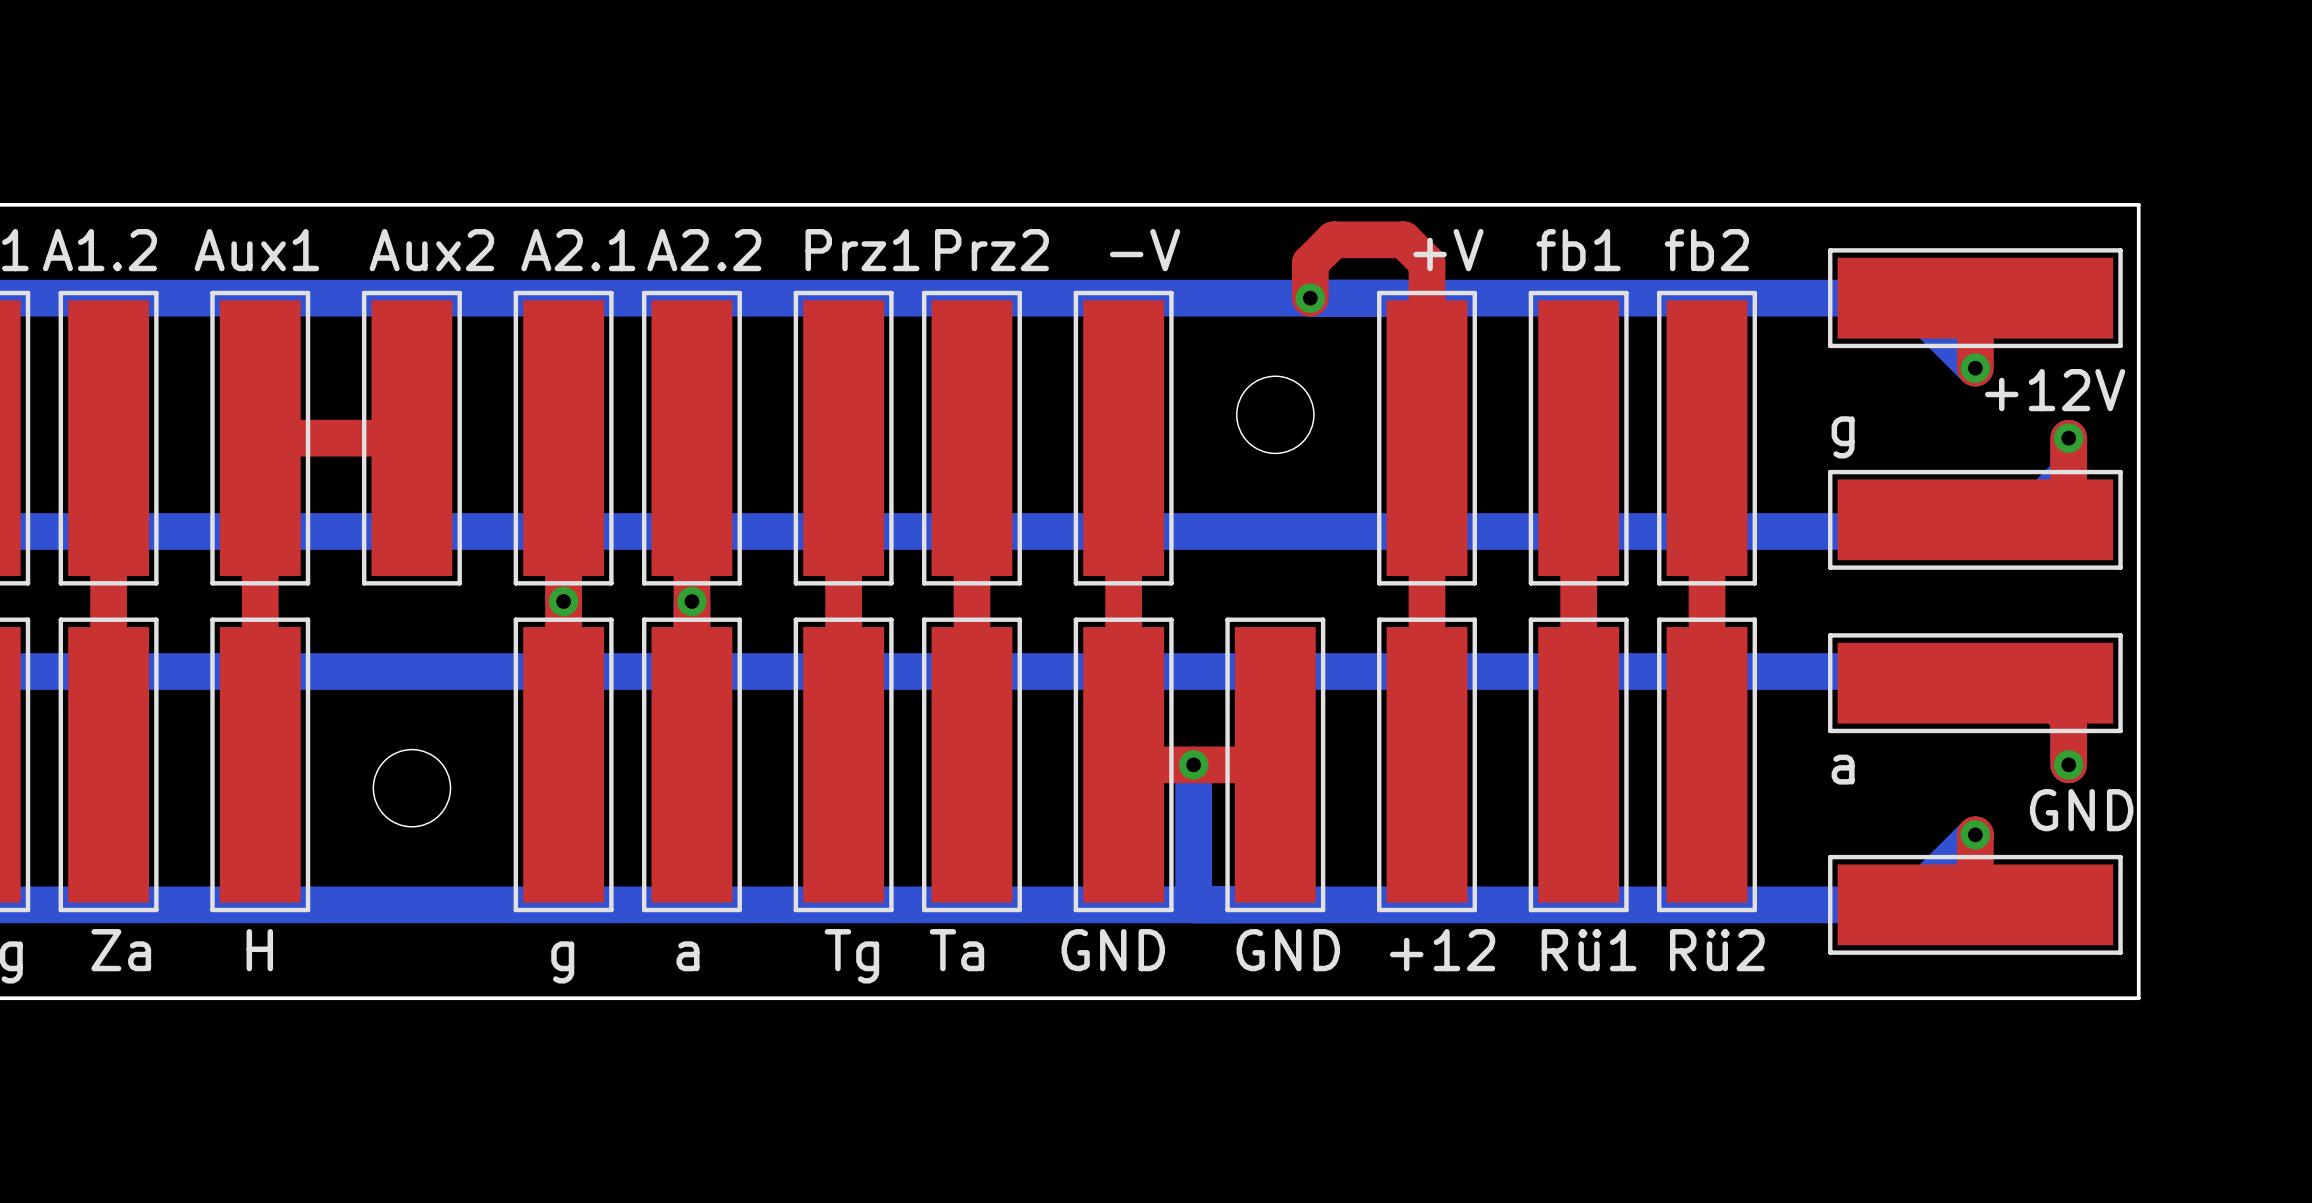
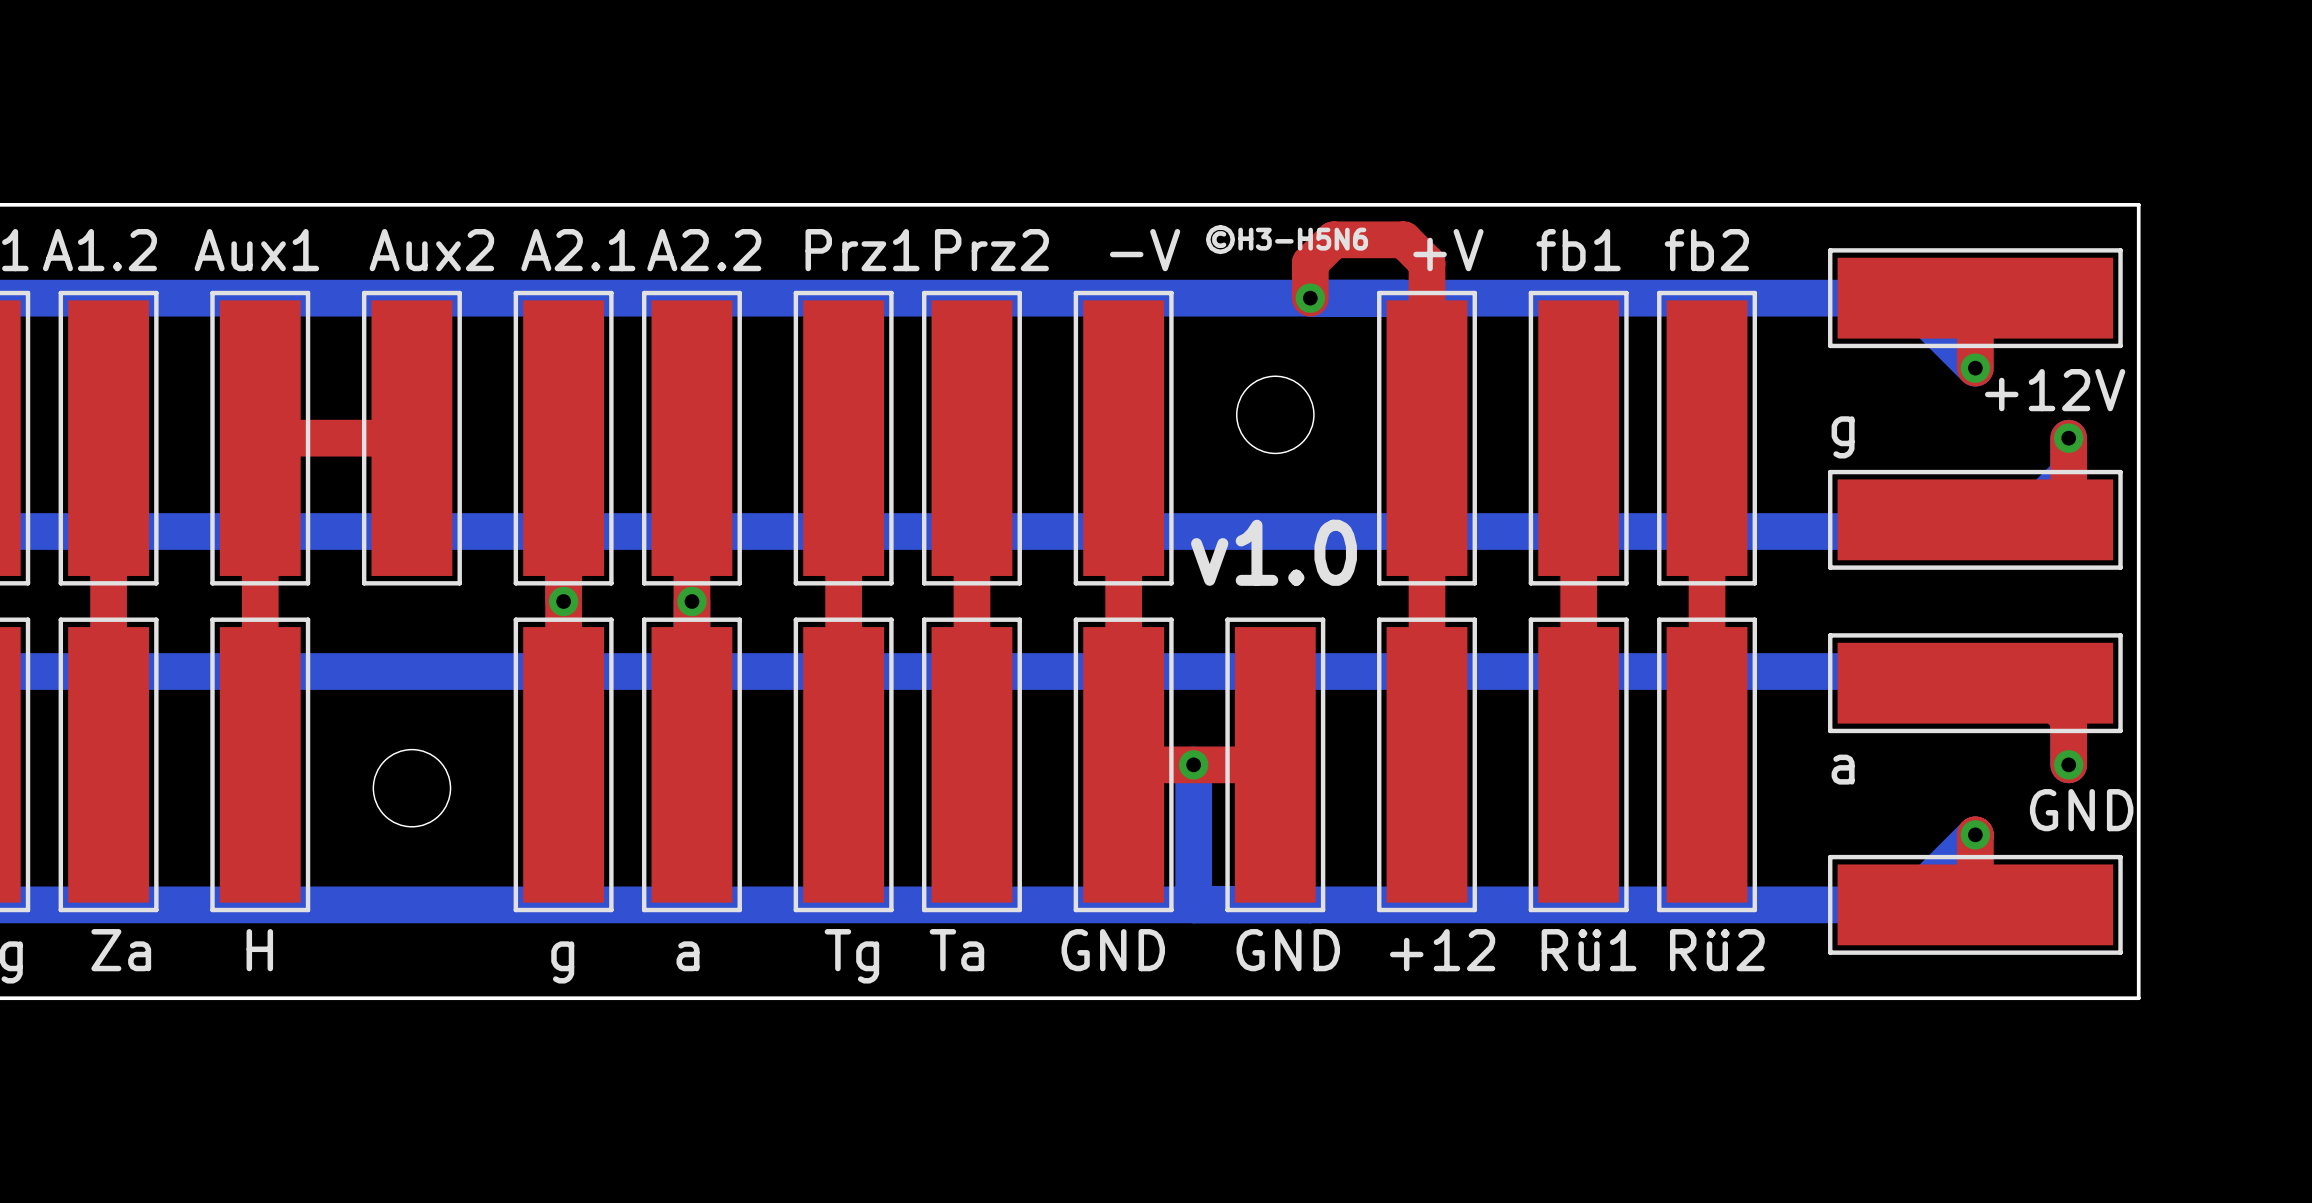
text: none -> ©H3-H5N6 (1287, 239)
text: none -> v1.0 (1274, 552)

